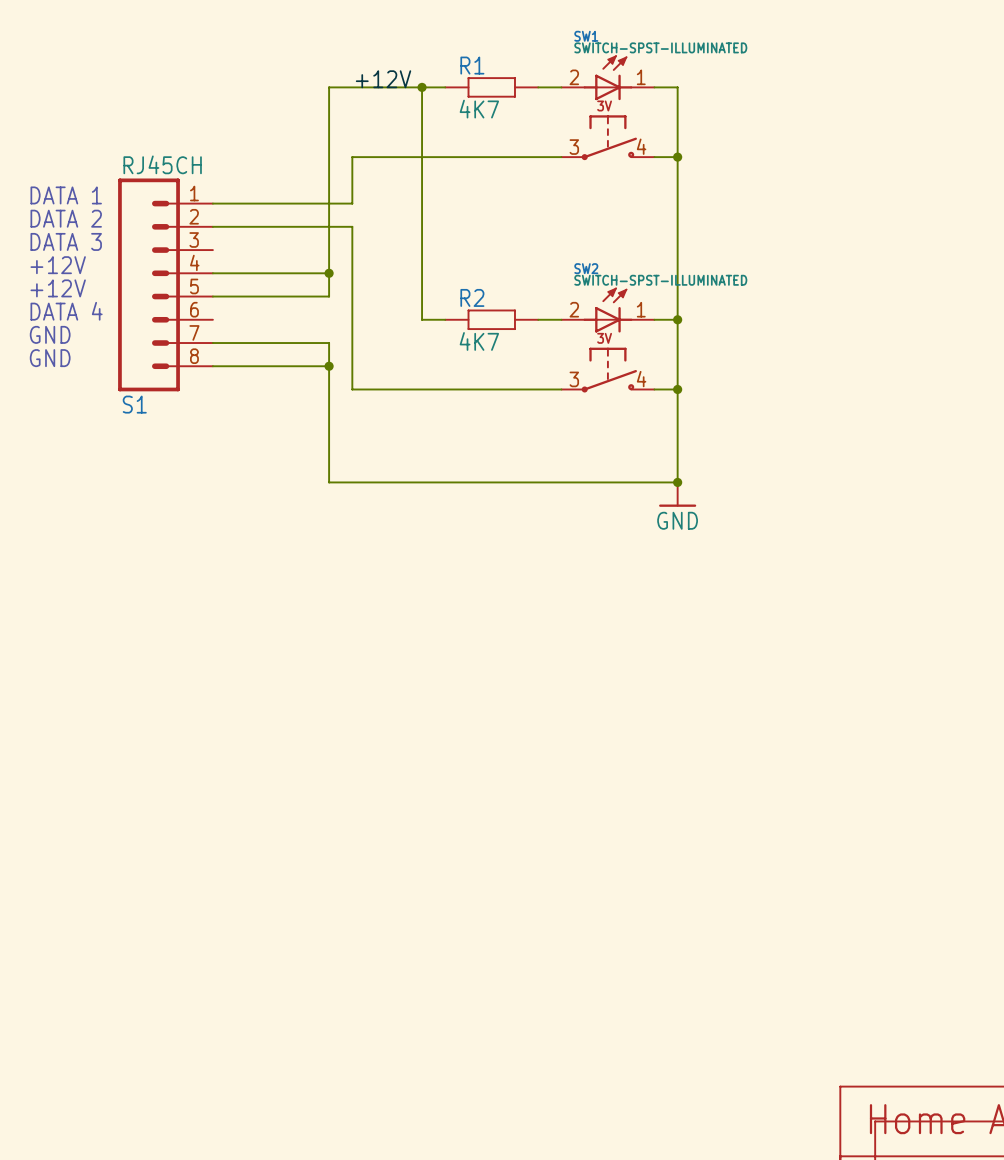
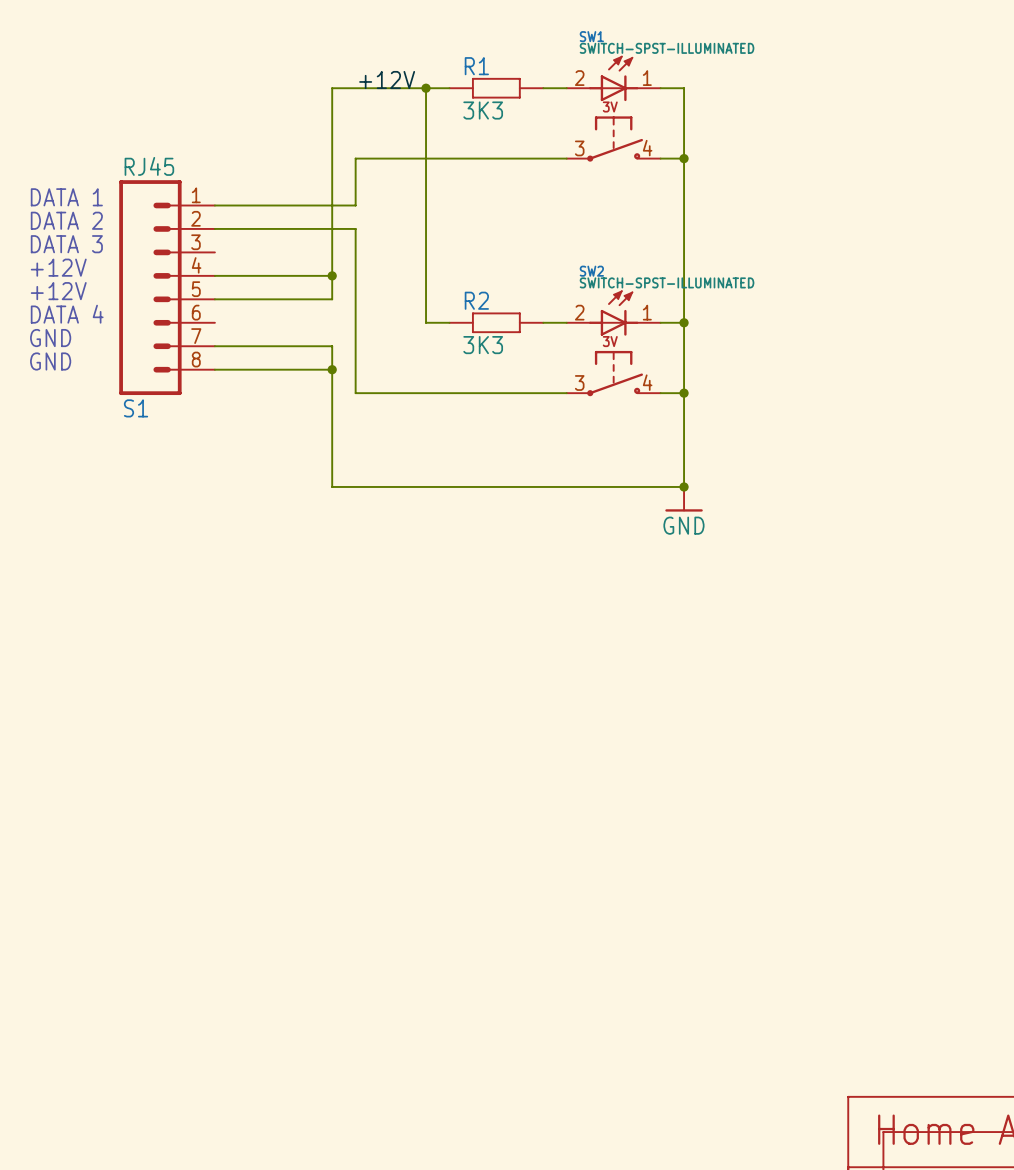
R1 value: 4K7 (479, 109) -> 3K3 (483, 110)
S1 value: RJ45CH (162, 164) -> RJ45 (149, 166)
R2 value: 4K7 (479, 341) -> 3K3 (483, 345)

